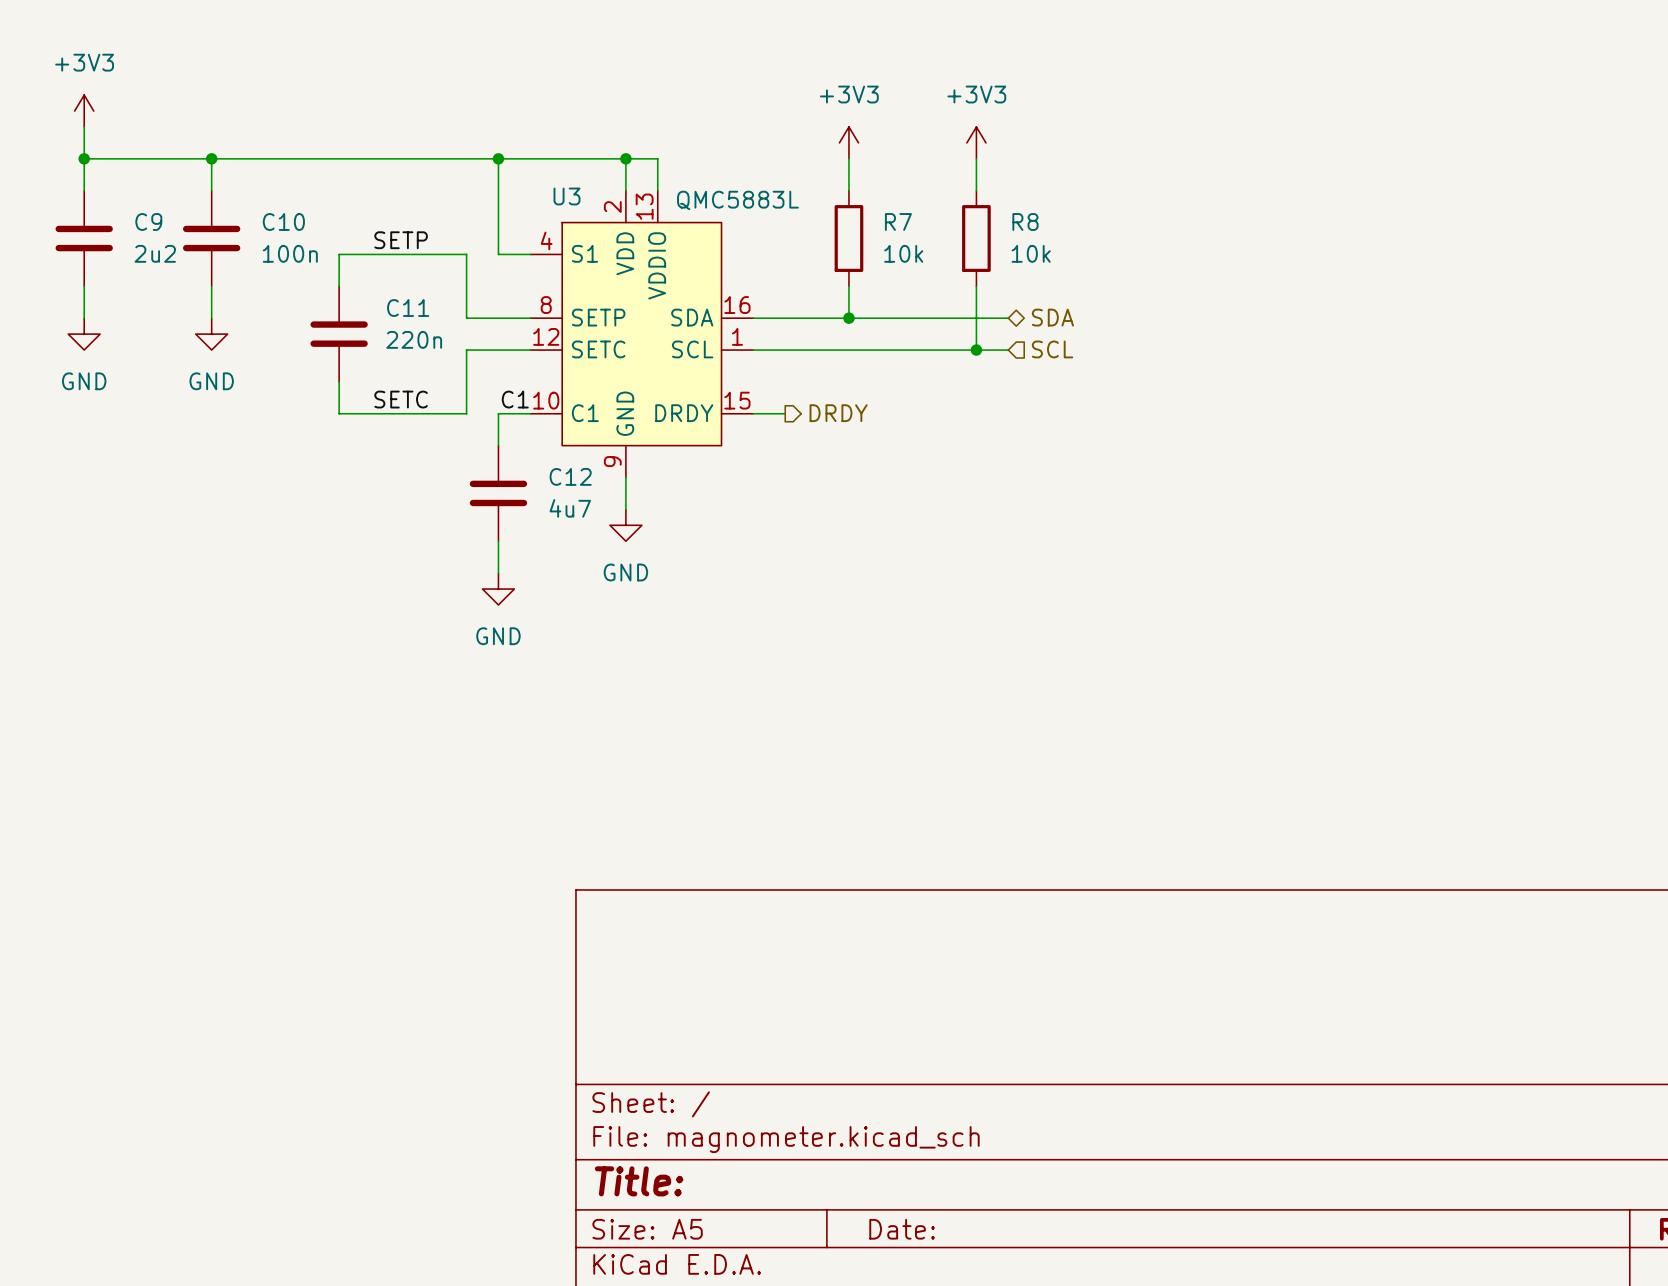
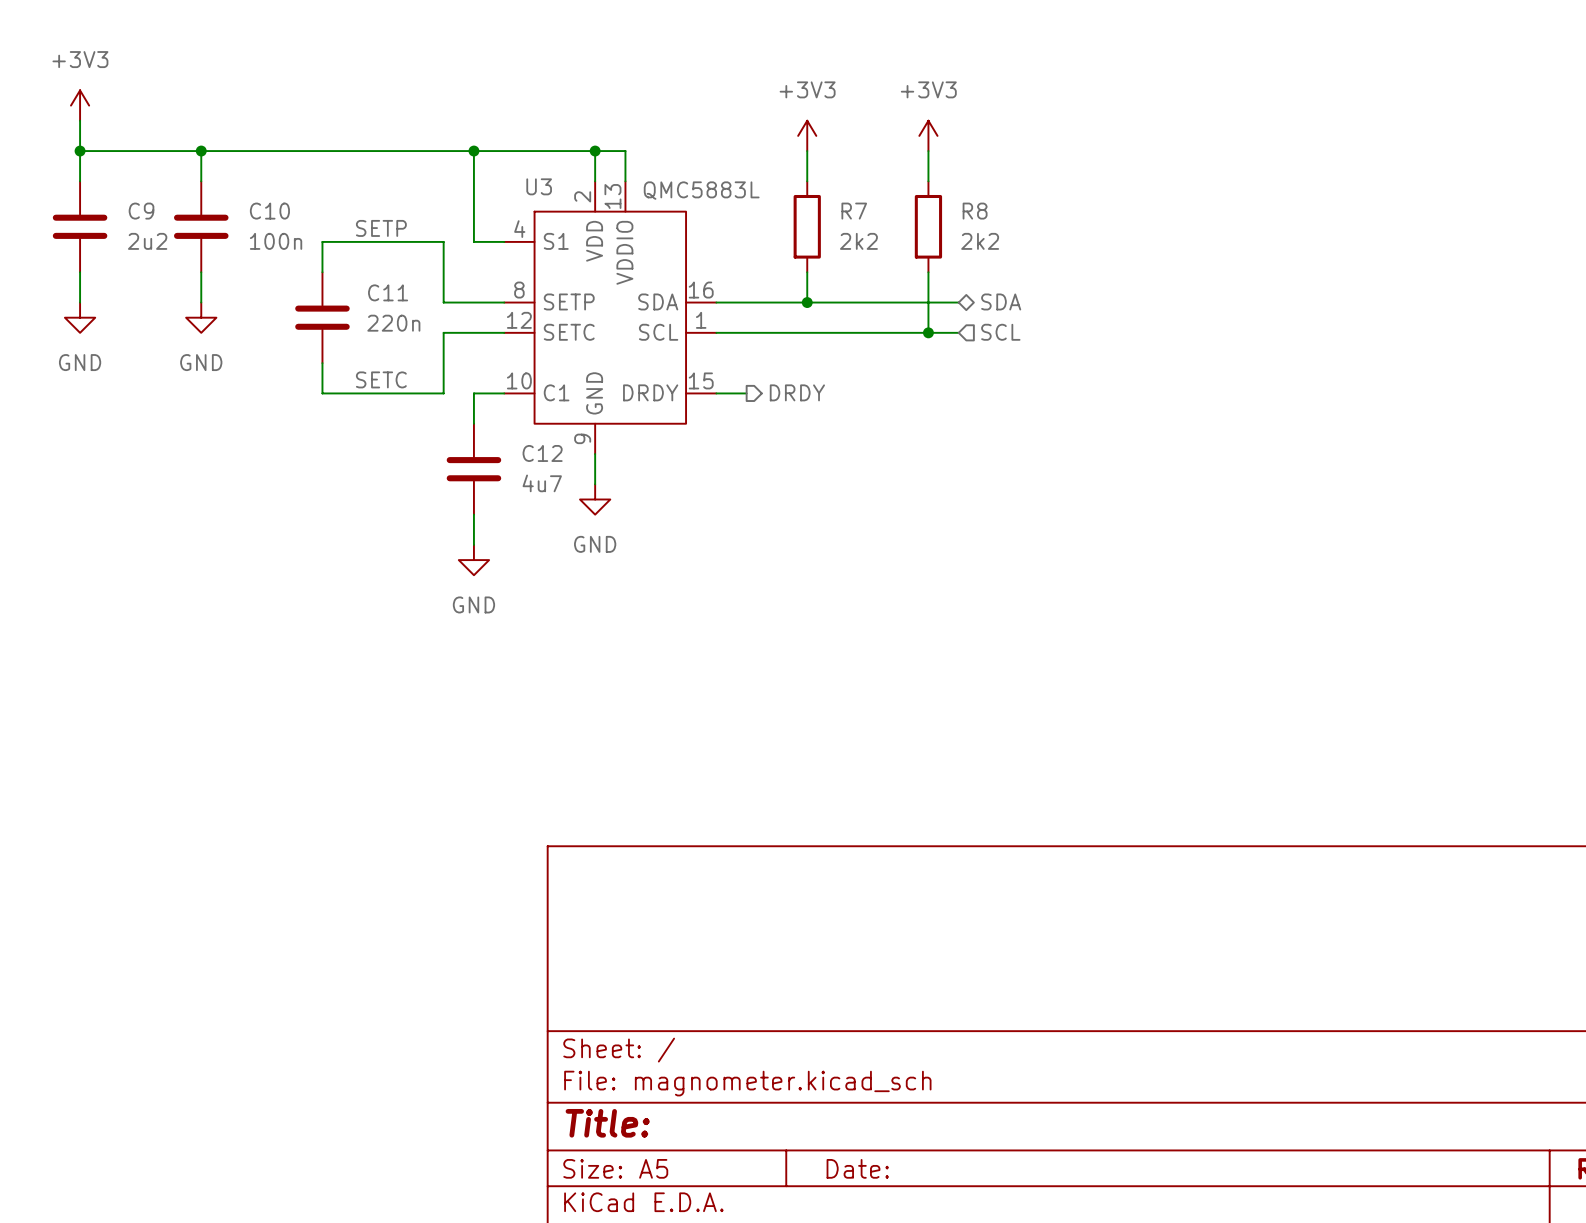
R7 value: 10k (903, 253) -> 2k2 (858, 241)
R8 value: 10k (1031, 253) -> 2k2 (980, 241)
label: C1 (515, 399) -> none

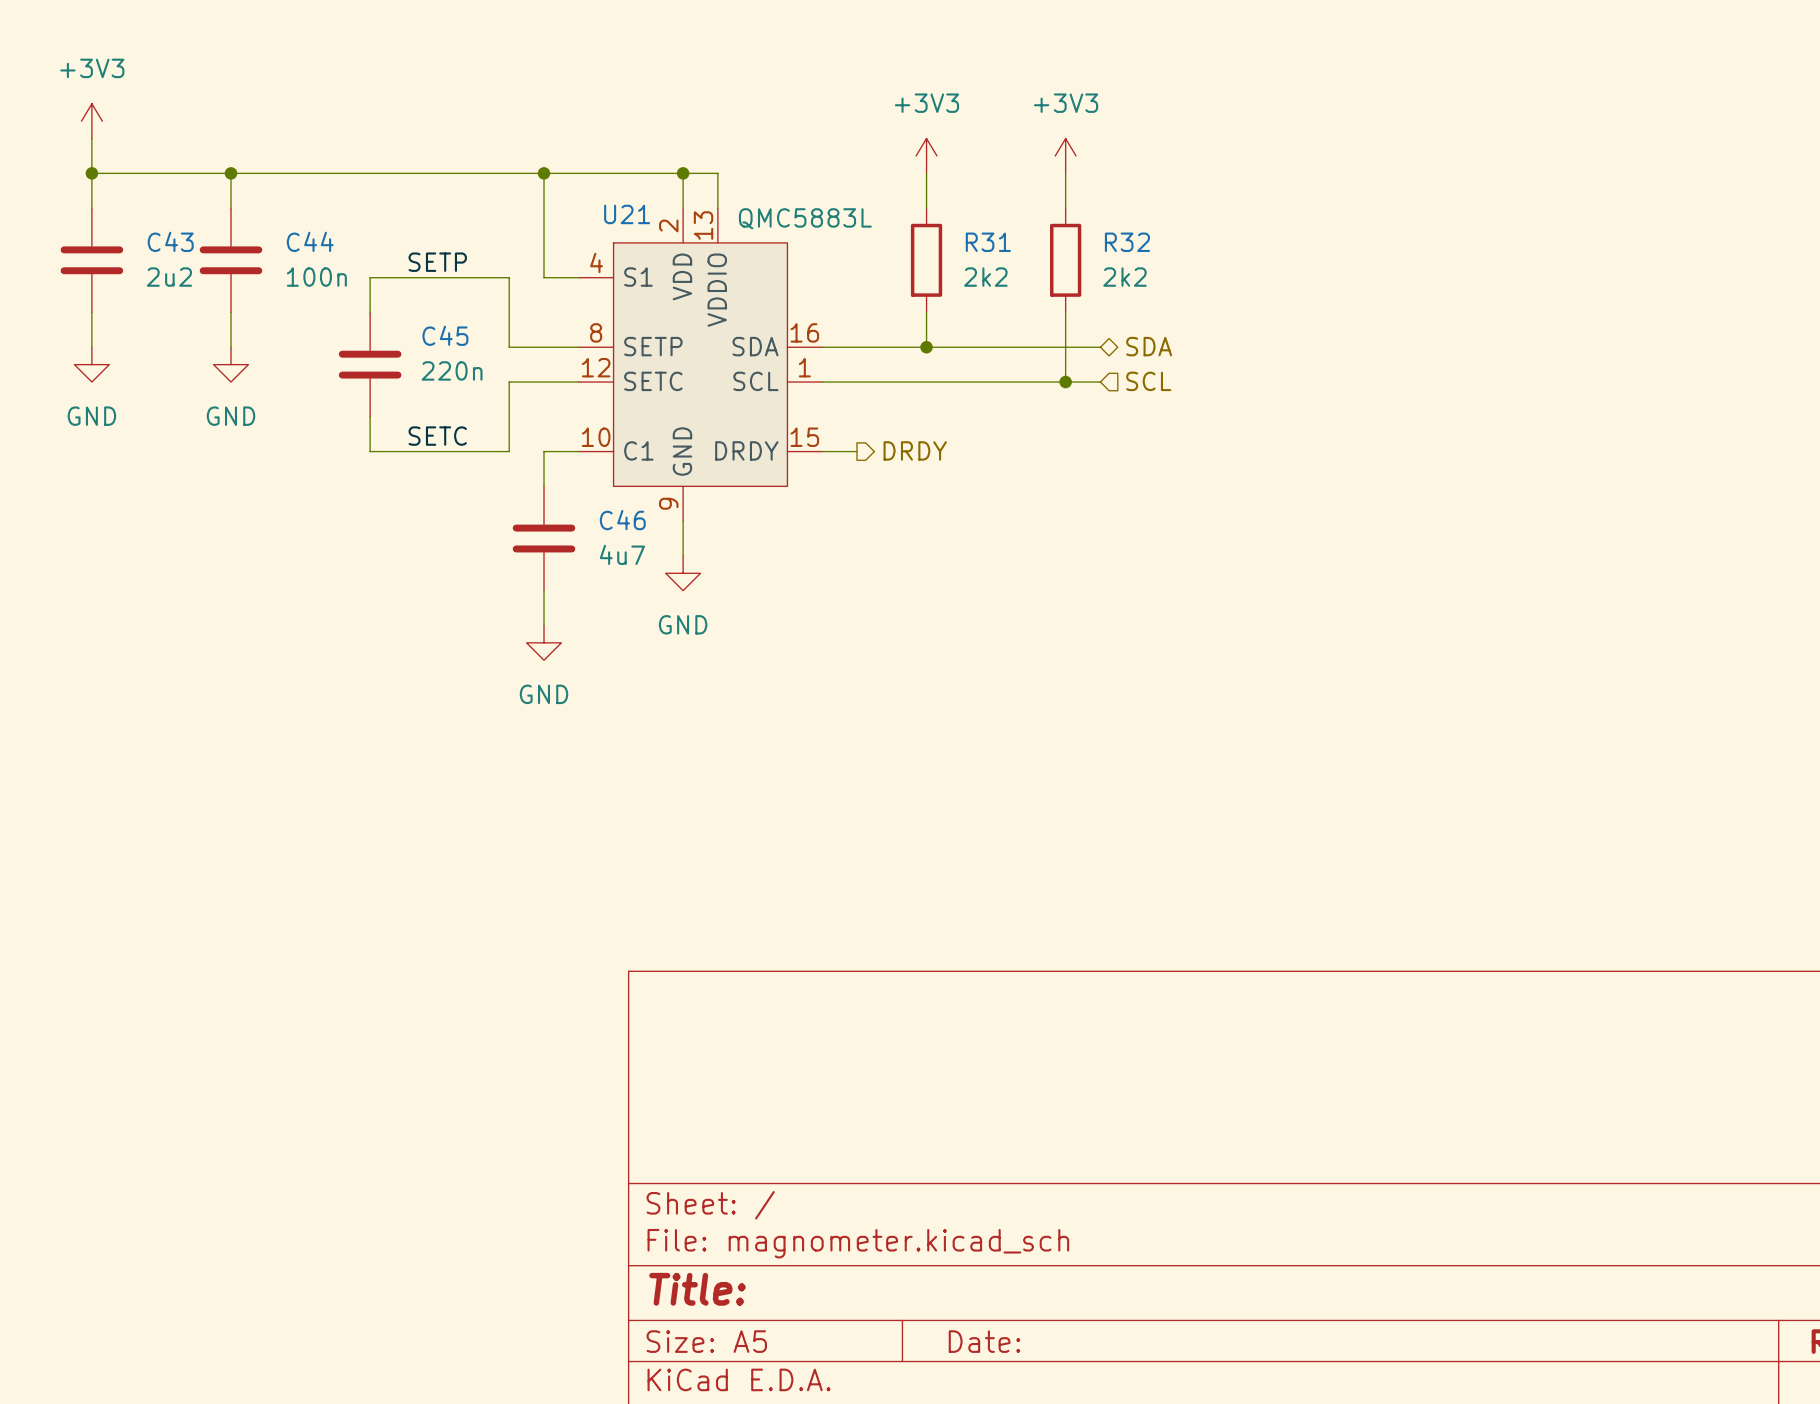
U3 name: U3 (539, 186) -> U21 (627, 214)
C9 name: C9 (141, 211) -> C43 (170, 241)
C10 name: C10 (269, 211) -> C44 (310, 241)
R7 name: R7 (854, 211) -> R31 (988, 242)
R8 name: R8 (975, 211) -> R32 (1127, 242)
C11 name: C11 (388, 292) -> C45 (445, 335)
C12 name: C12 (542, 453) -> C46 (622, 520)

